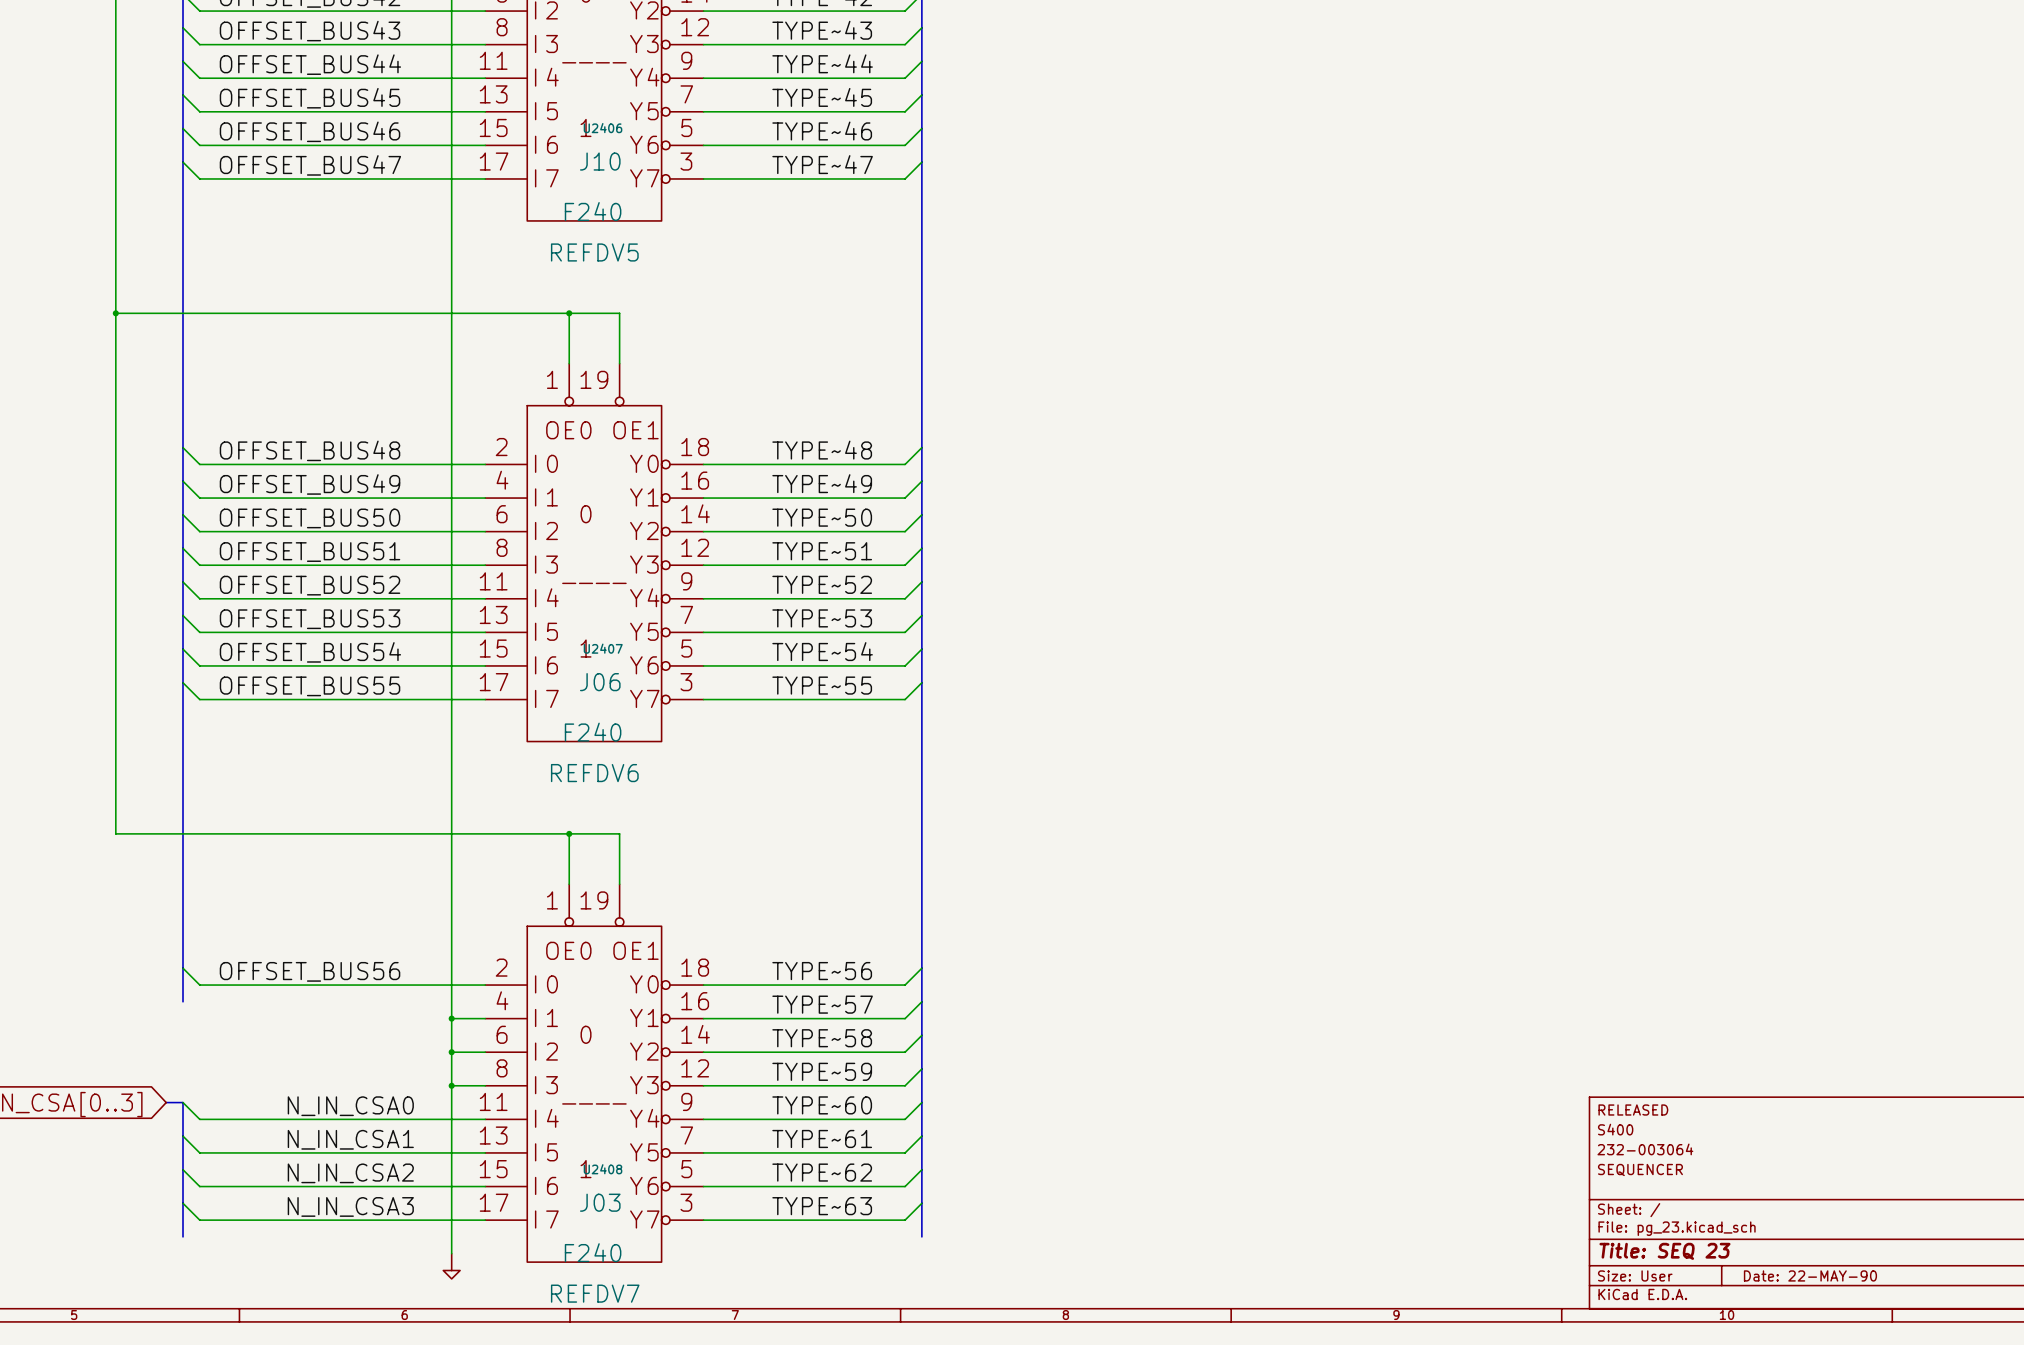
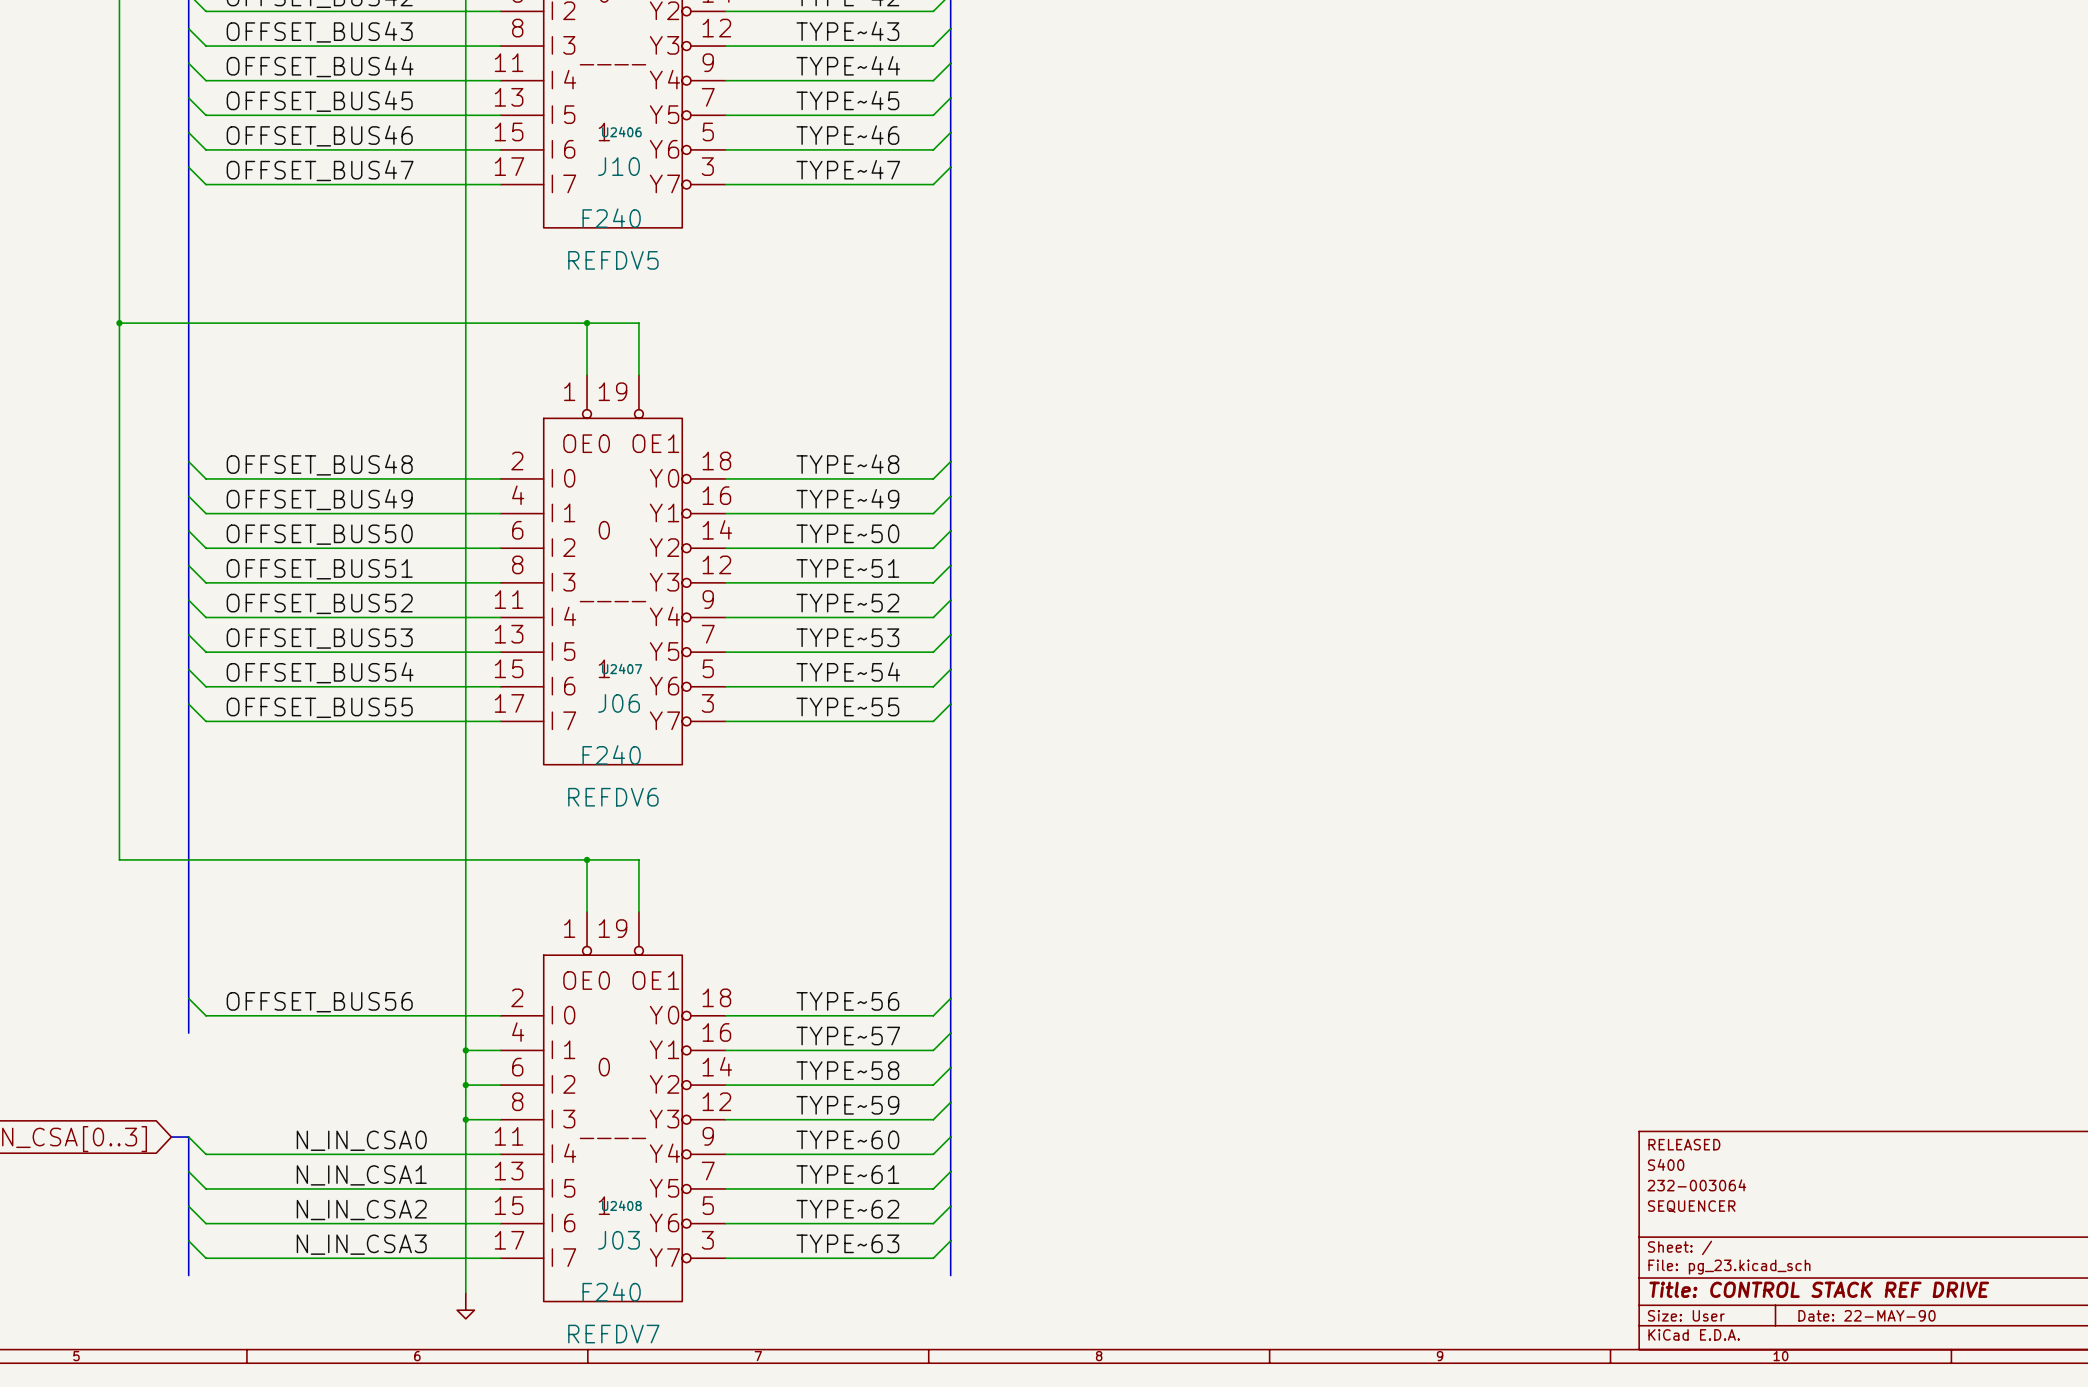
title block: Title: SEQ 23 (1664, 1251) -> Title: CONTROL STACK REF DRIVE (1819, 1289)

